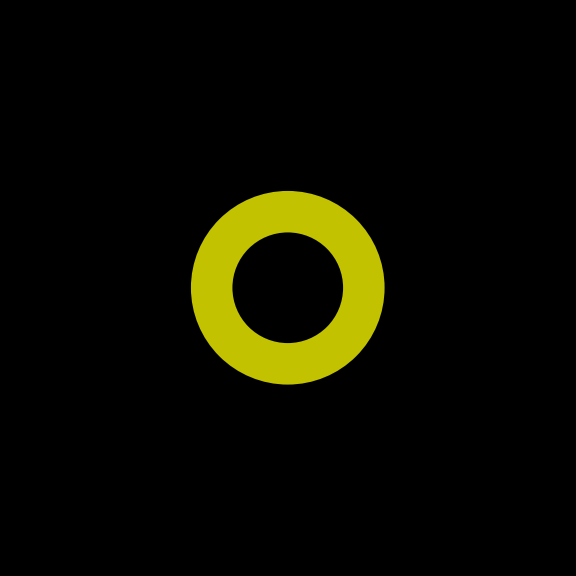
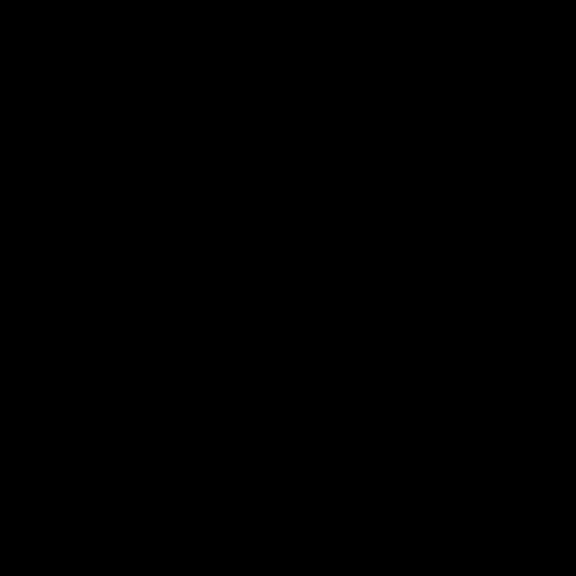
part: (287, 287) -> none

